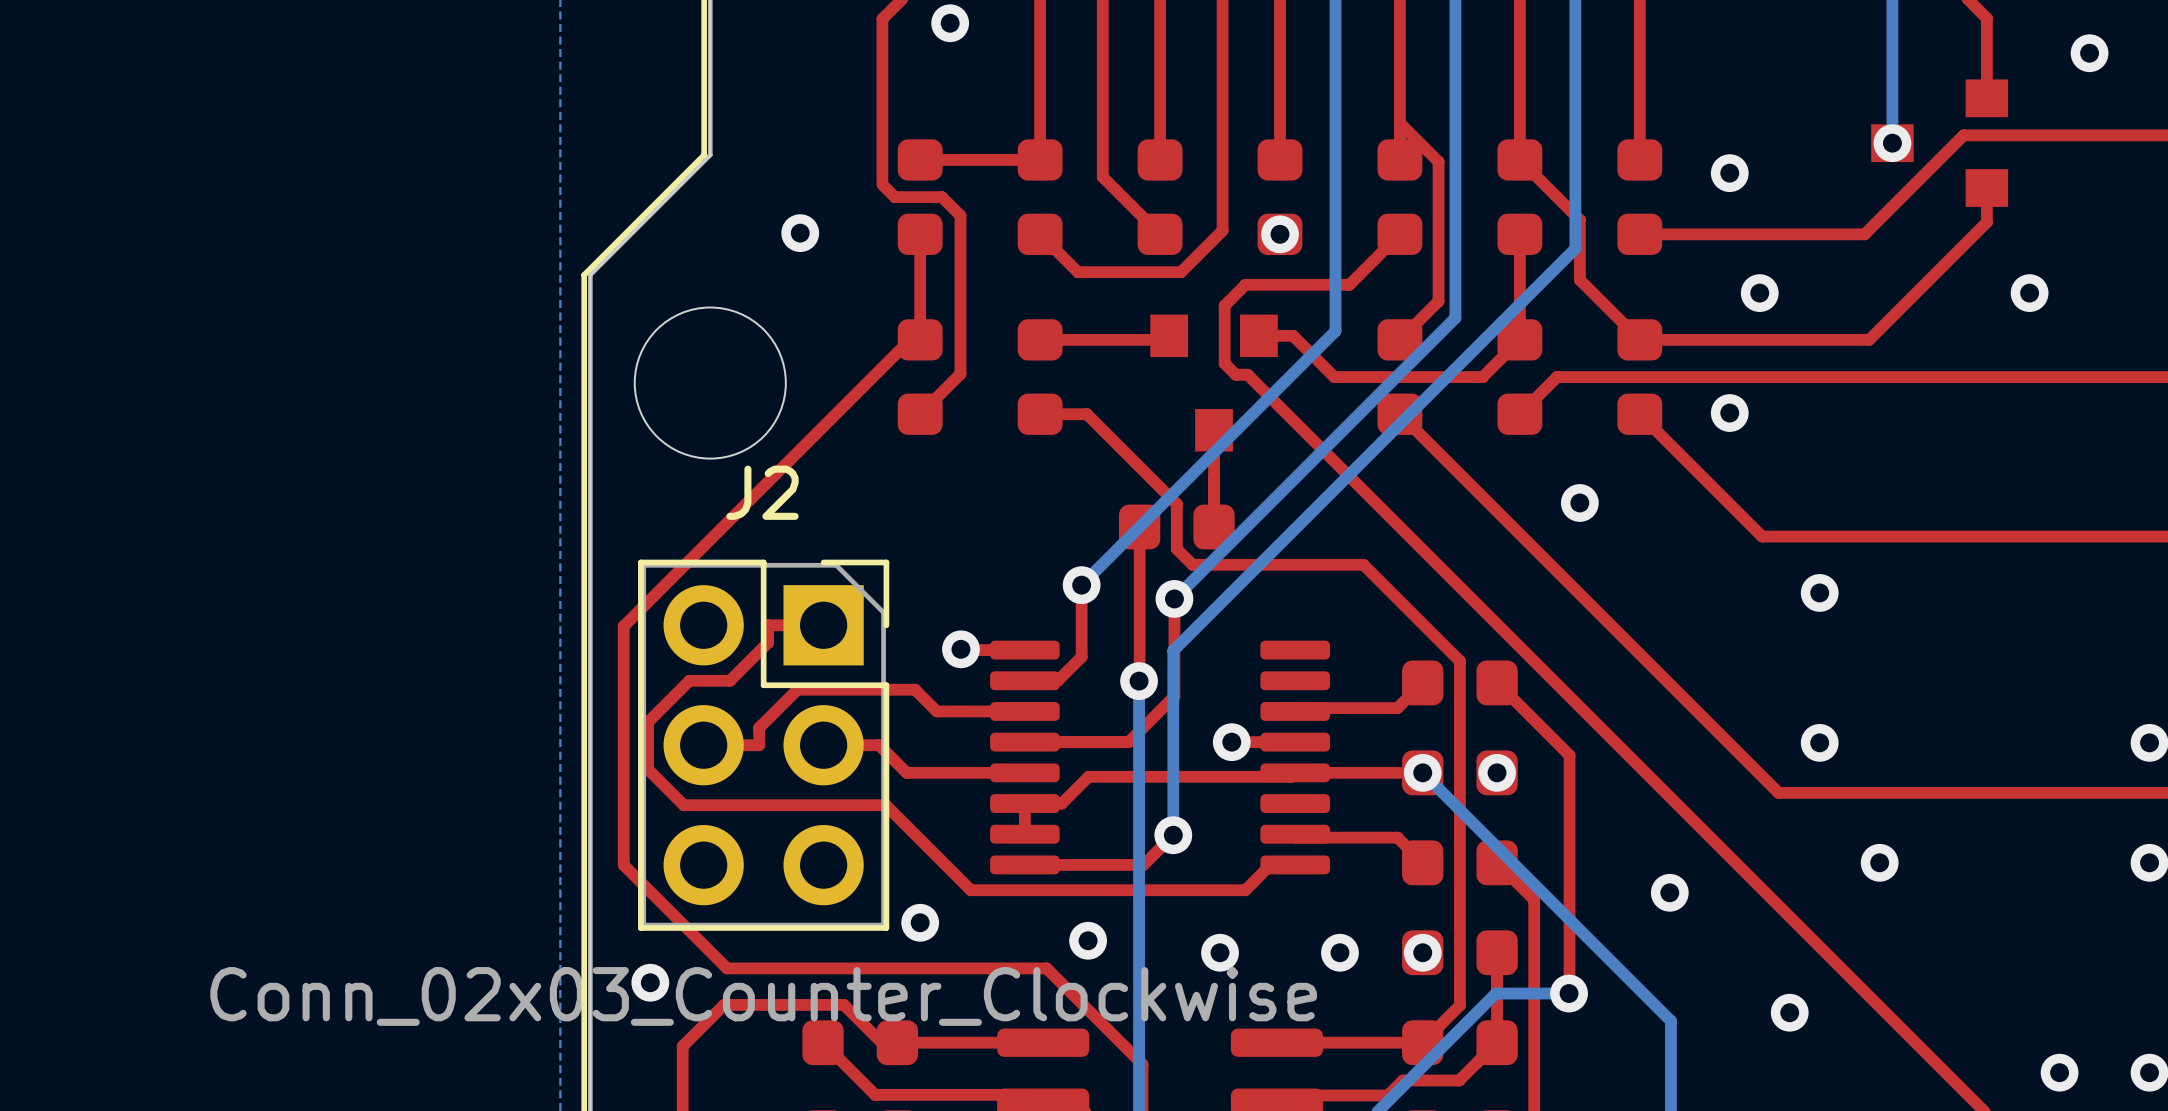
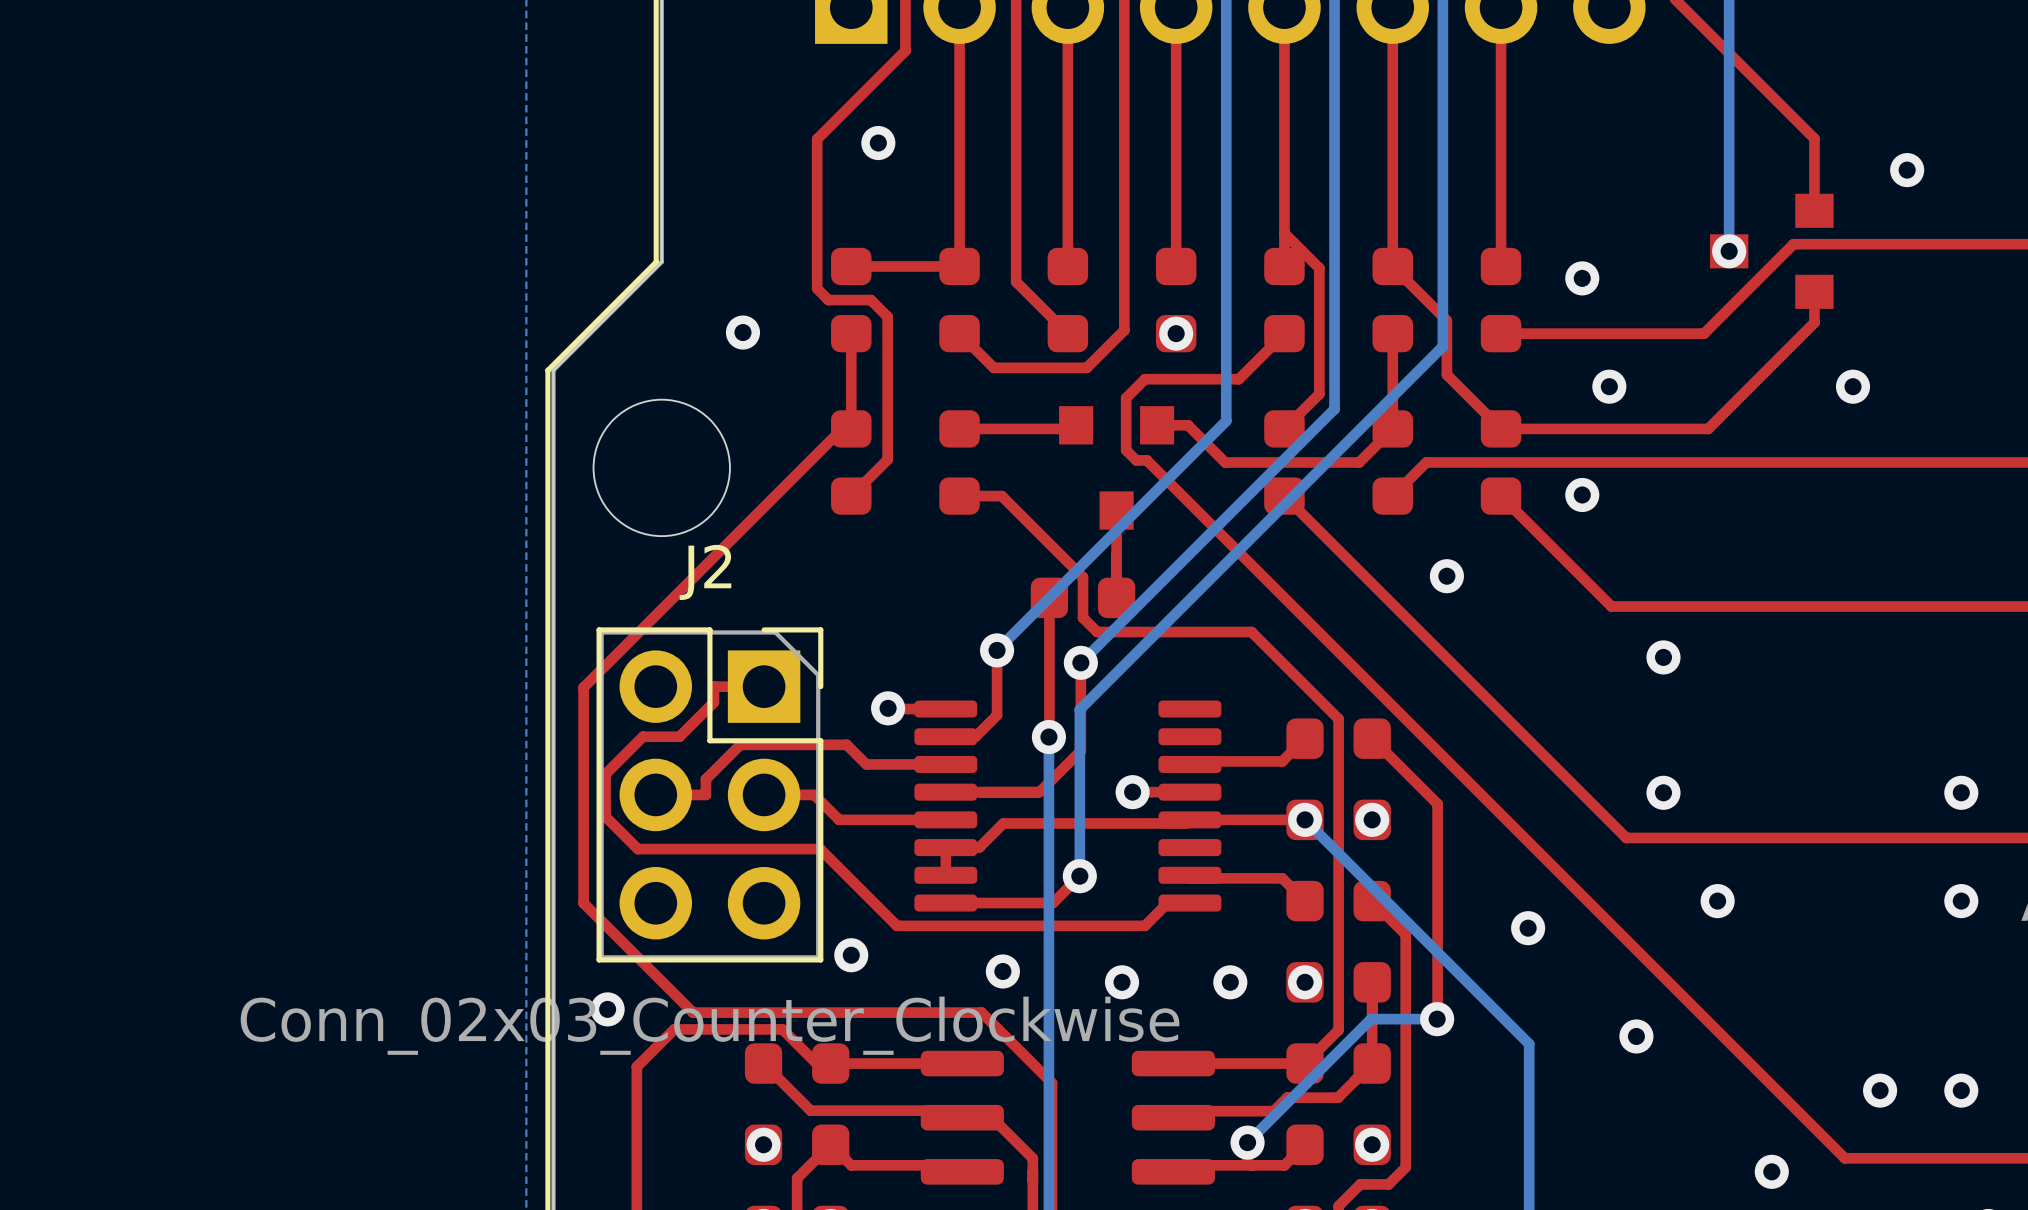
top track: (727, 968) (1046, 968) (1064, 986) -> (676, 996) (693, 1012) (981, 1012)

